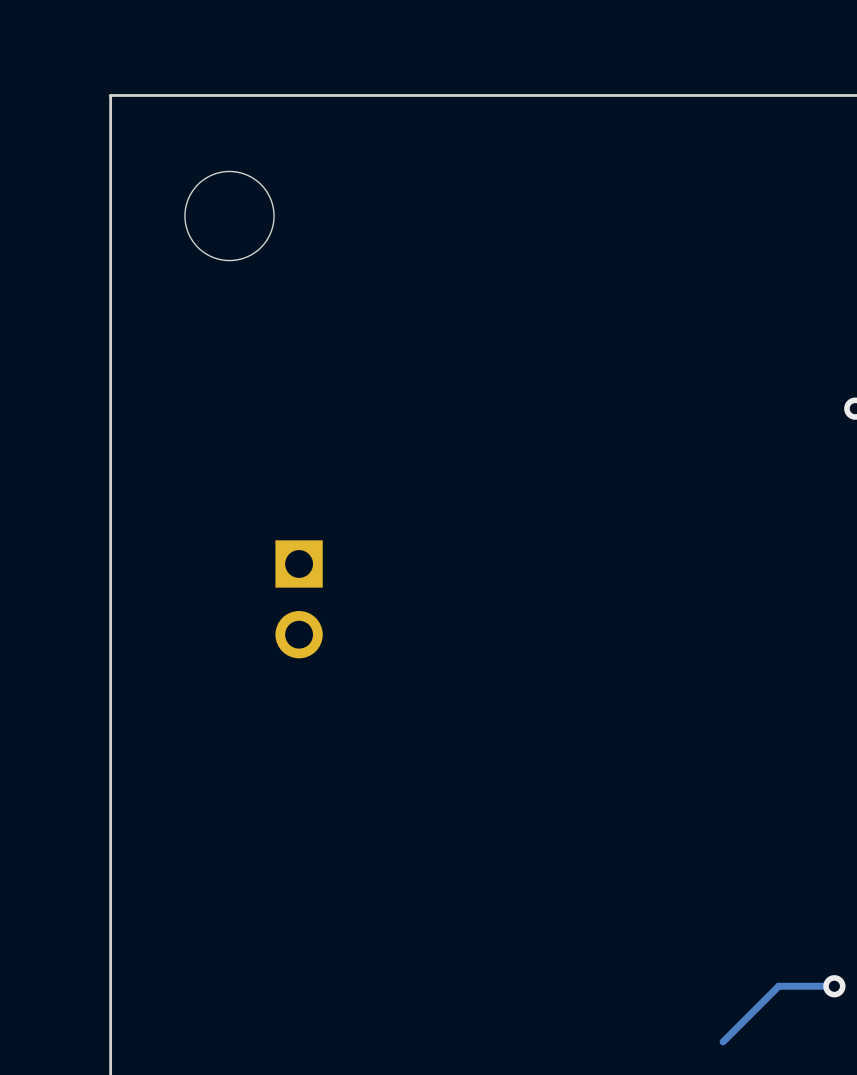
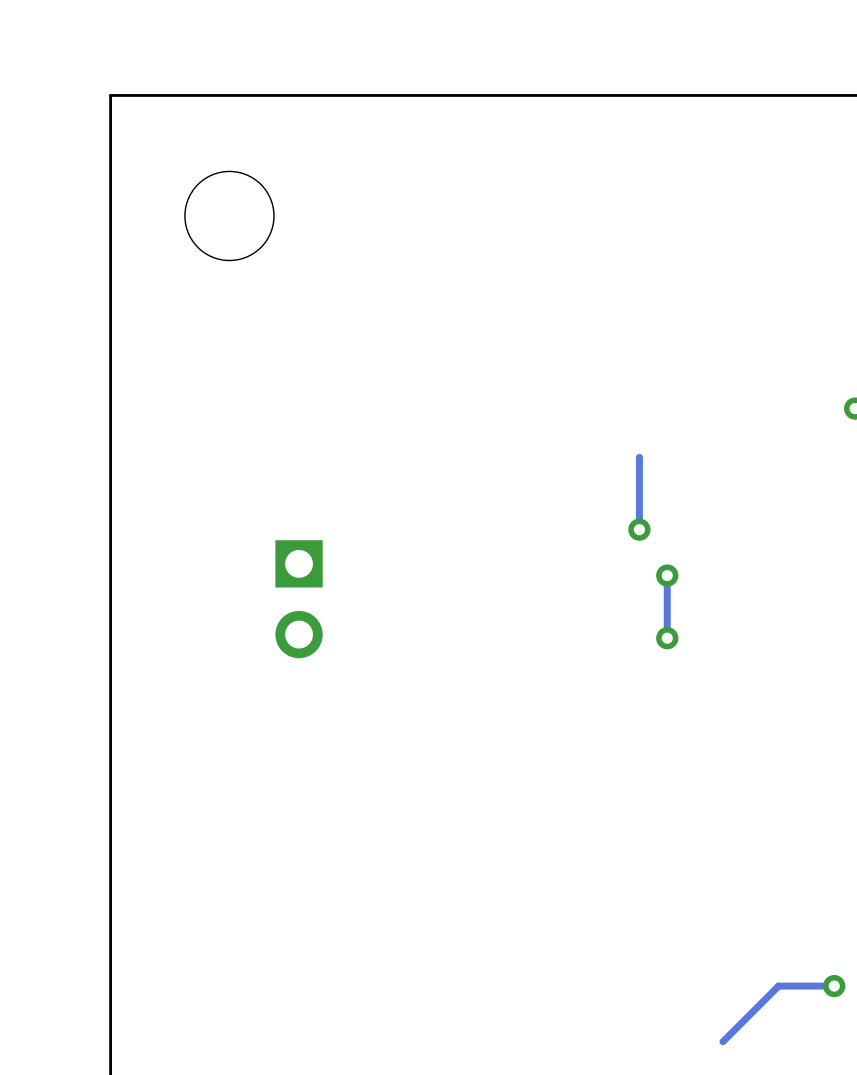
track: none -> (639, 457) (639, 529)
via: none -> (639, 529)
track: none -> (667, 575) (667, 638)
via: none -> (667, 575)
via: none -> (667, 638)

